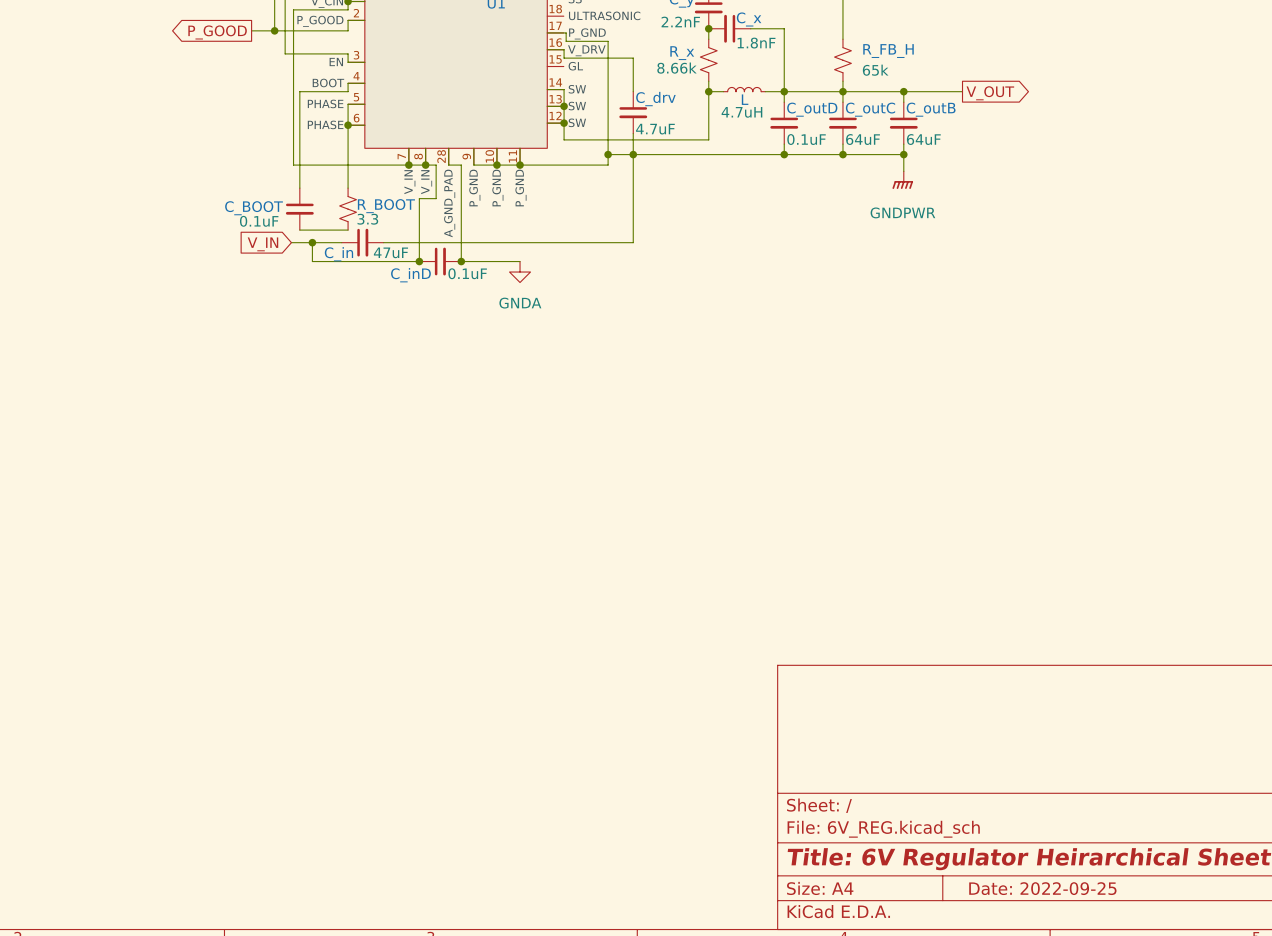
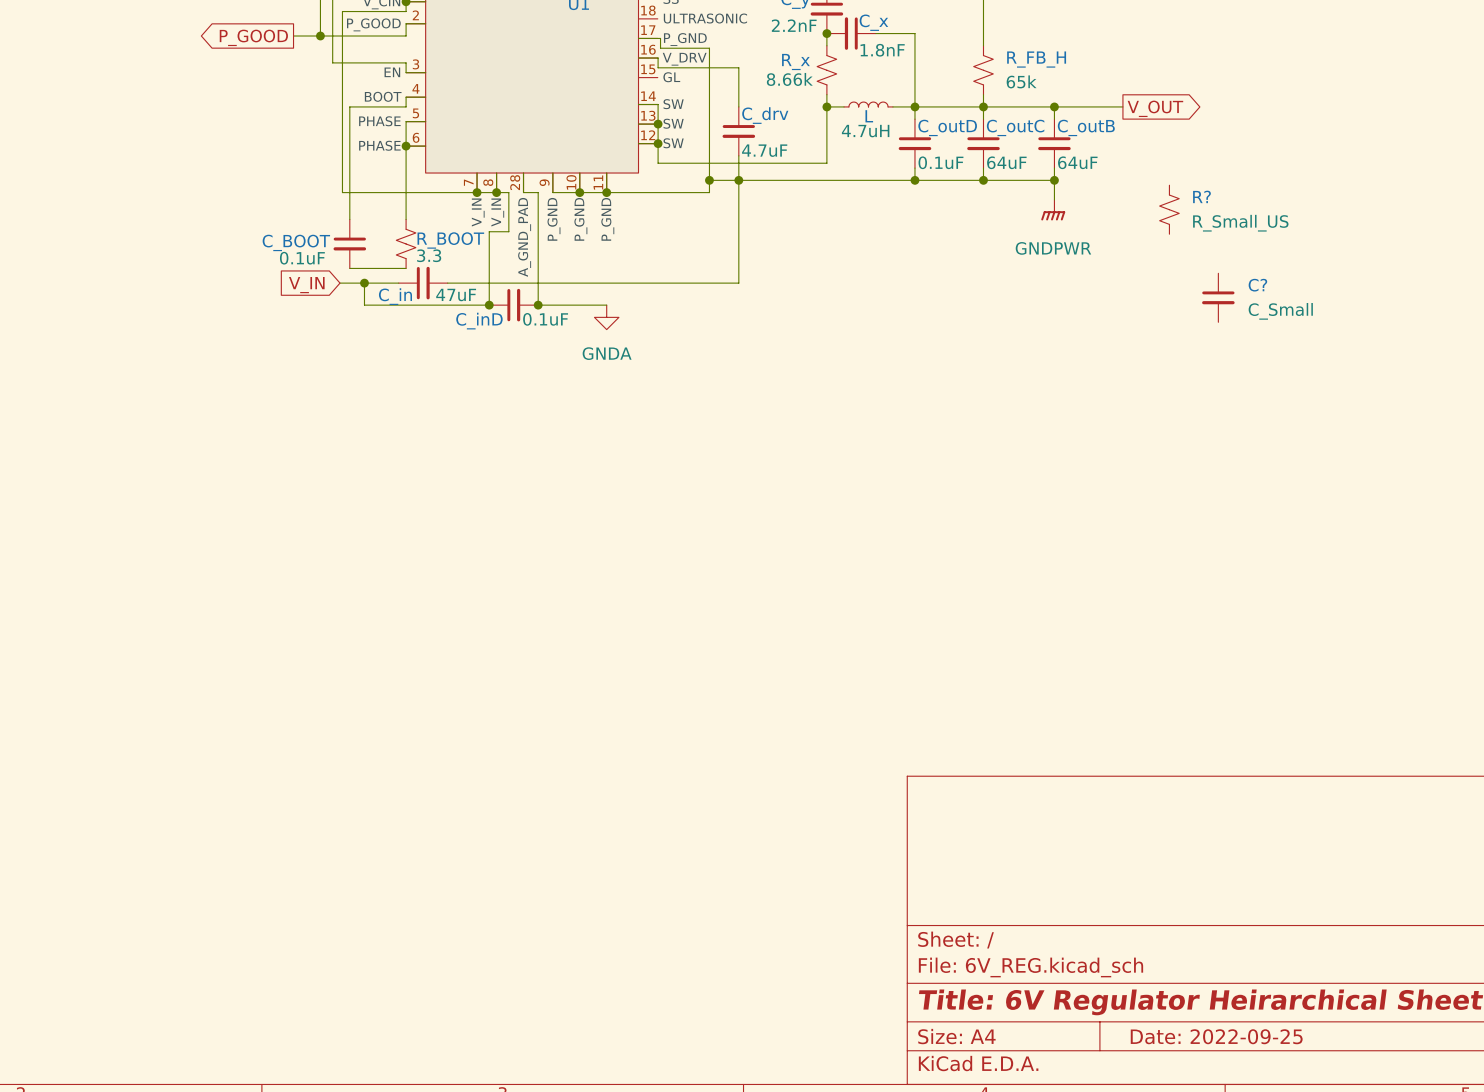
R?: none -> R_Small_US (1169, 209)
C?: none -> C_Small (1218, 297)

